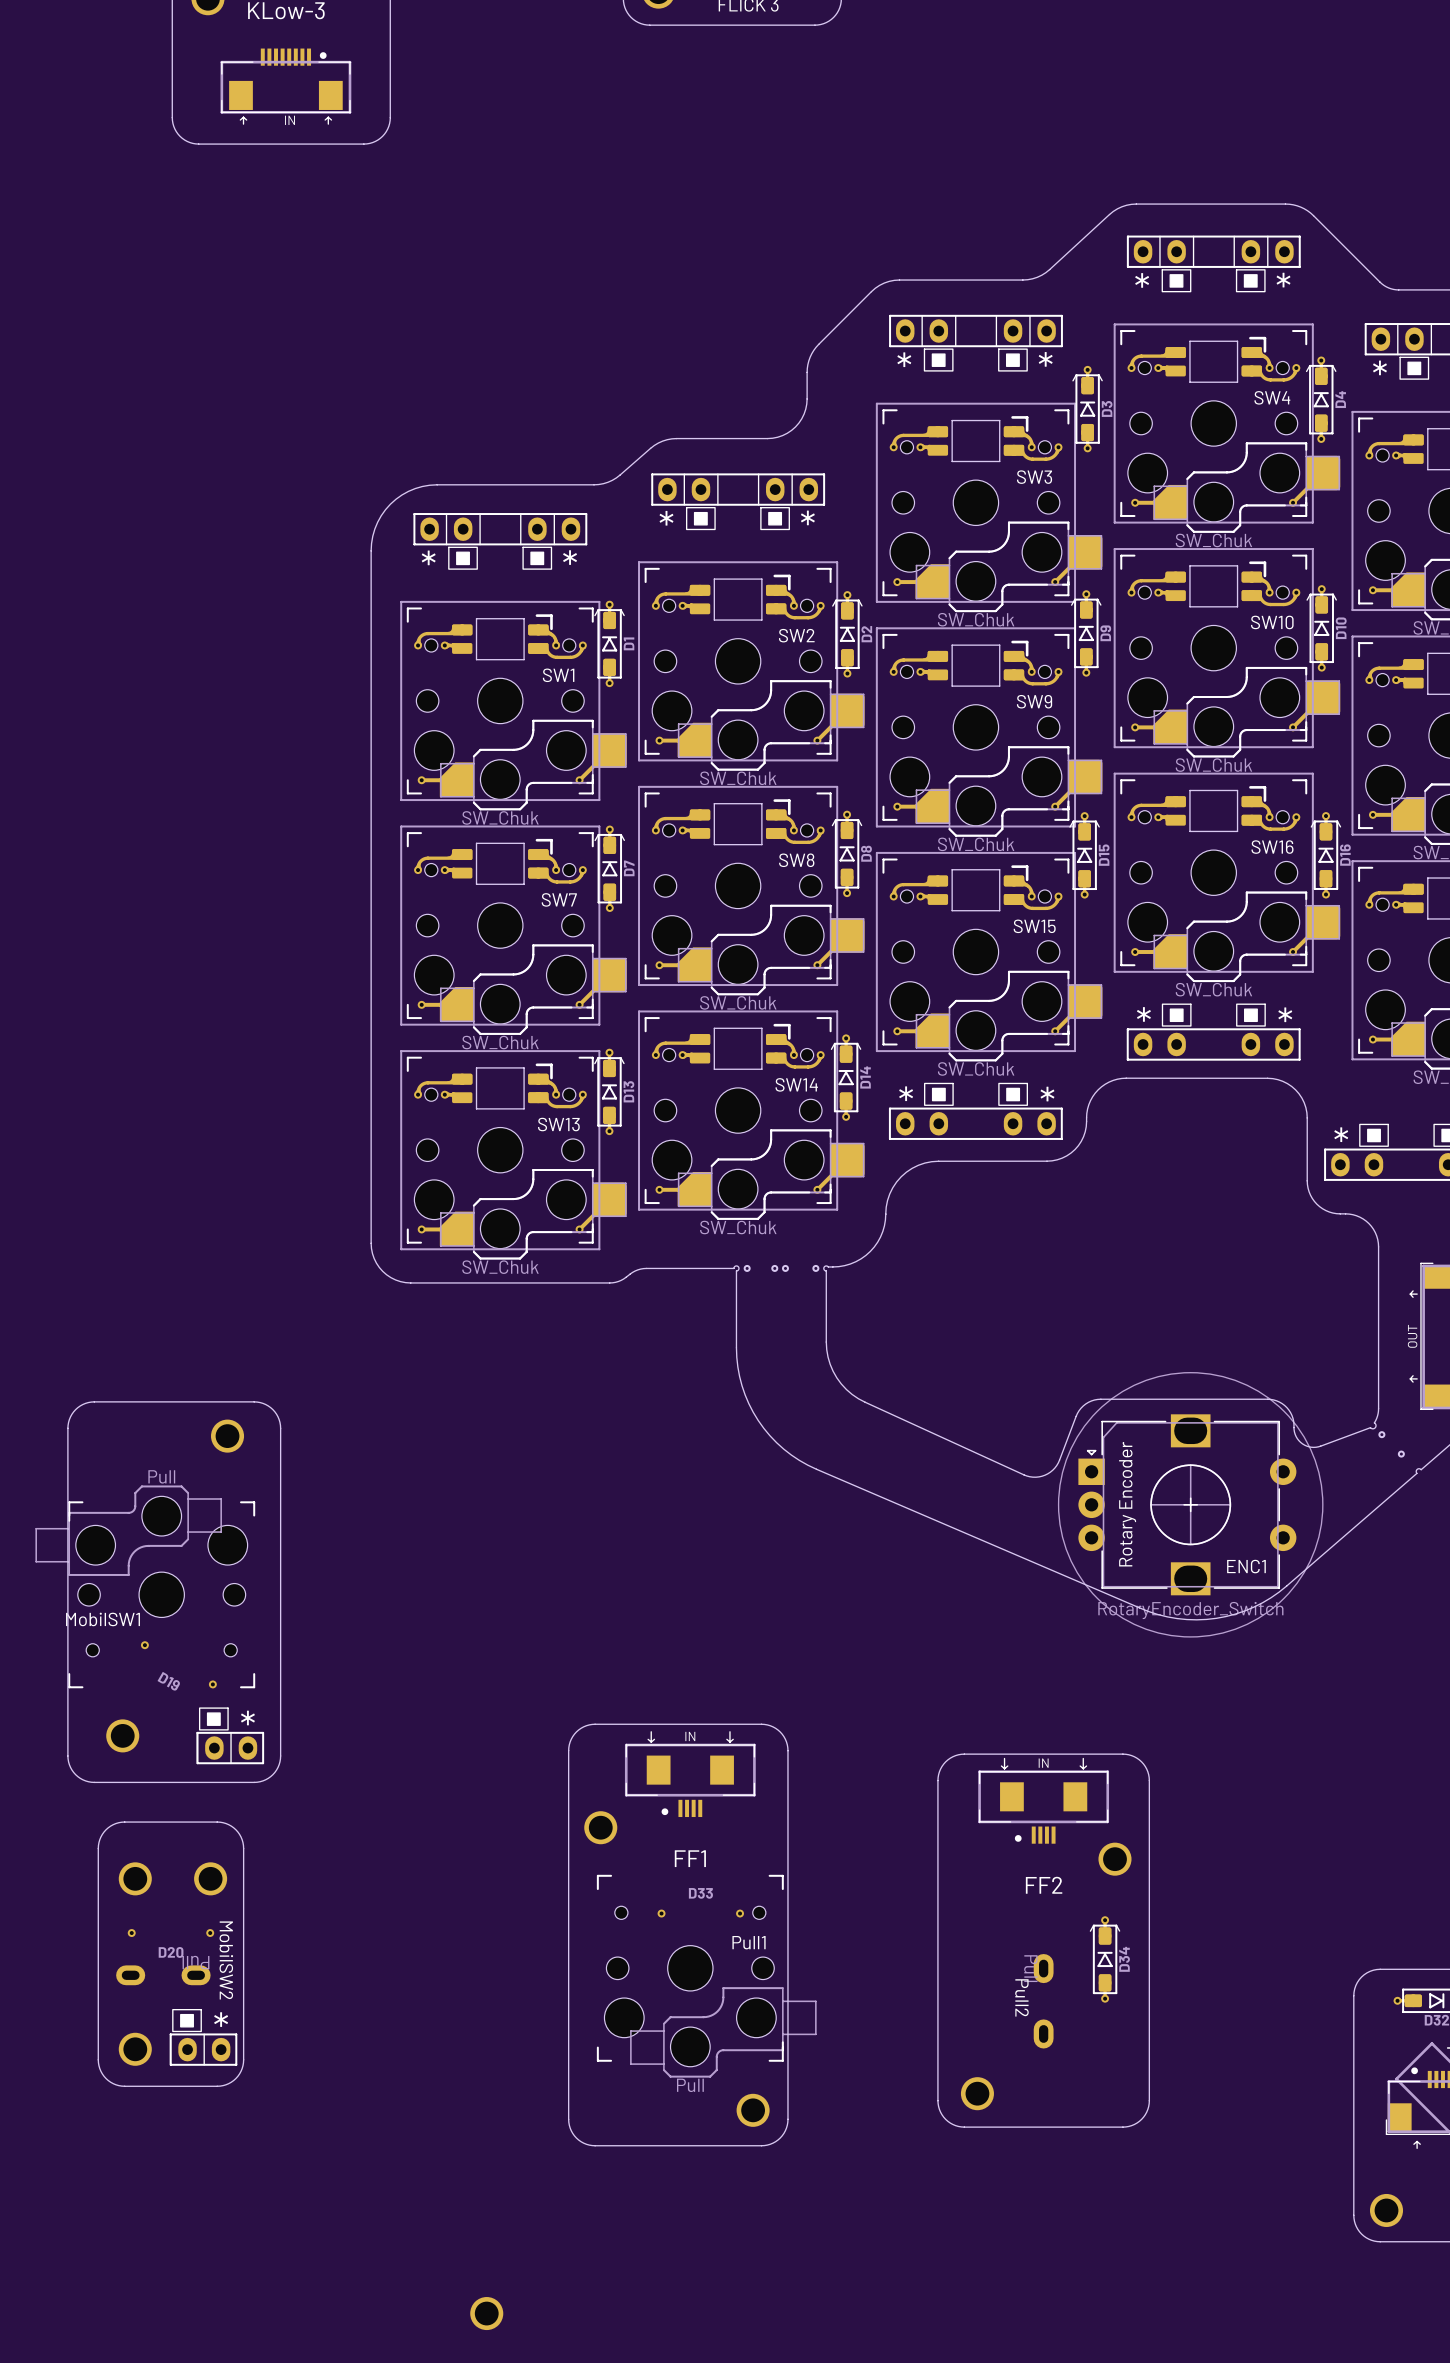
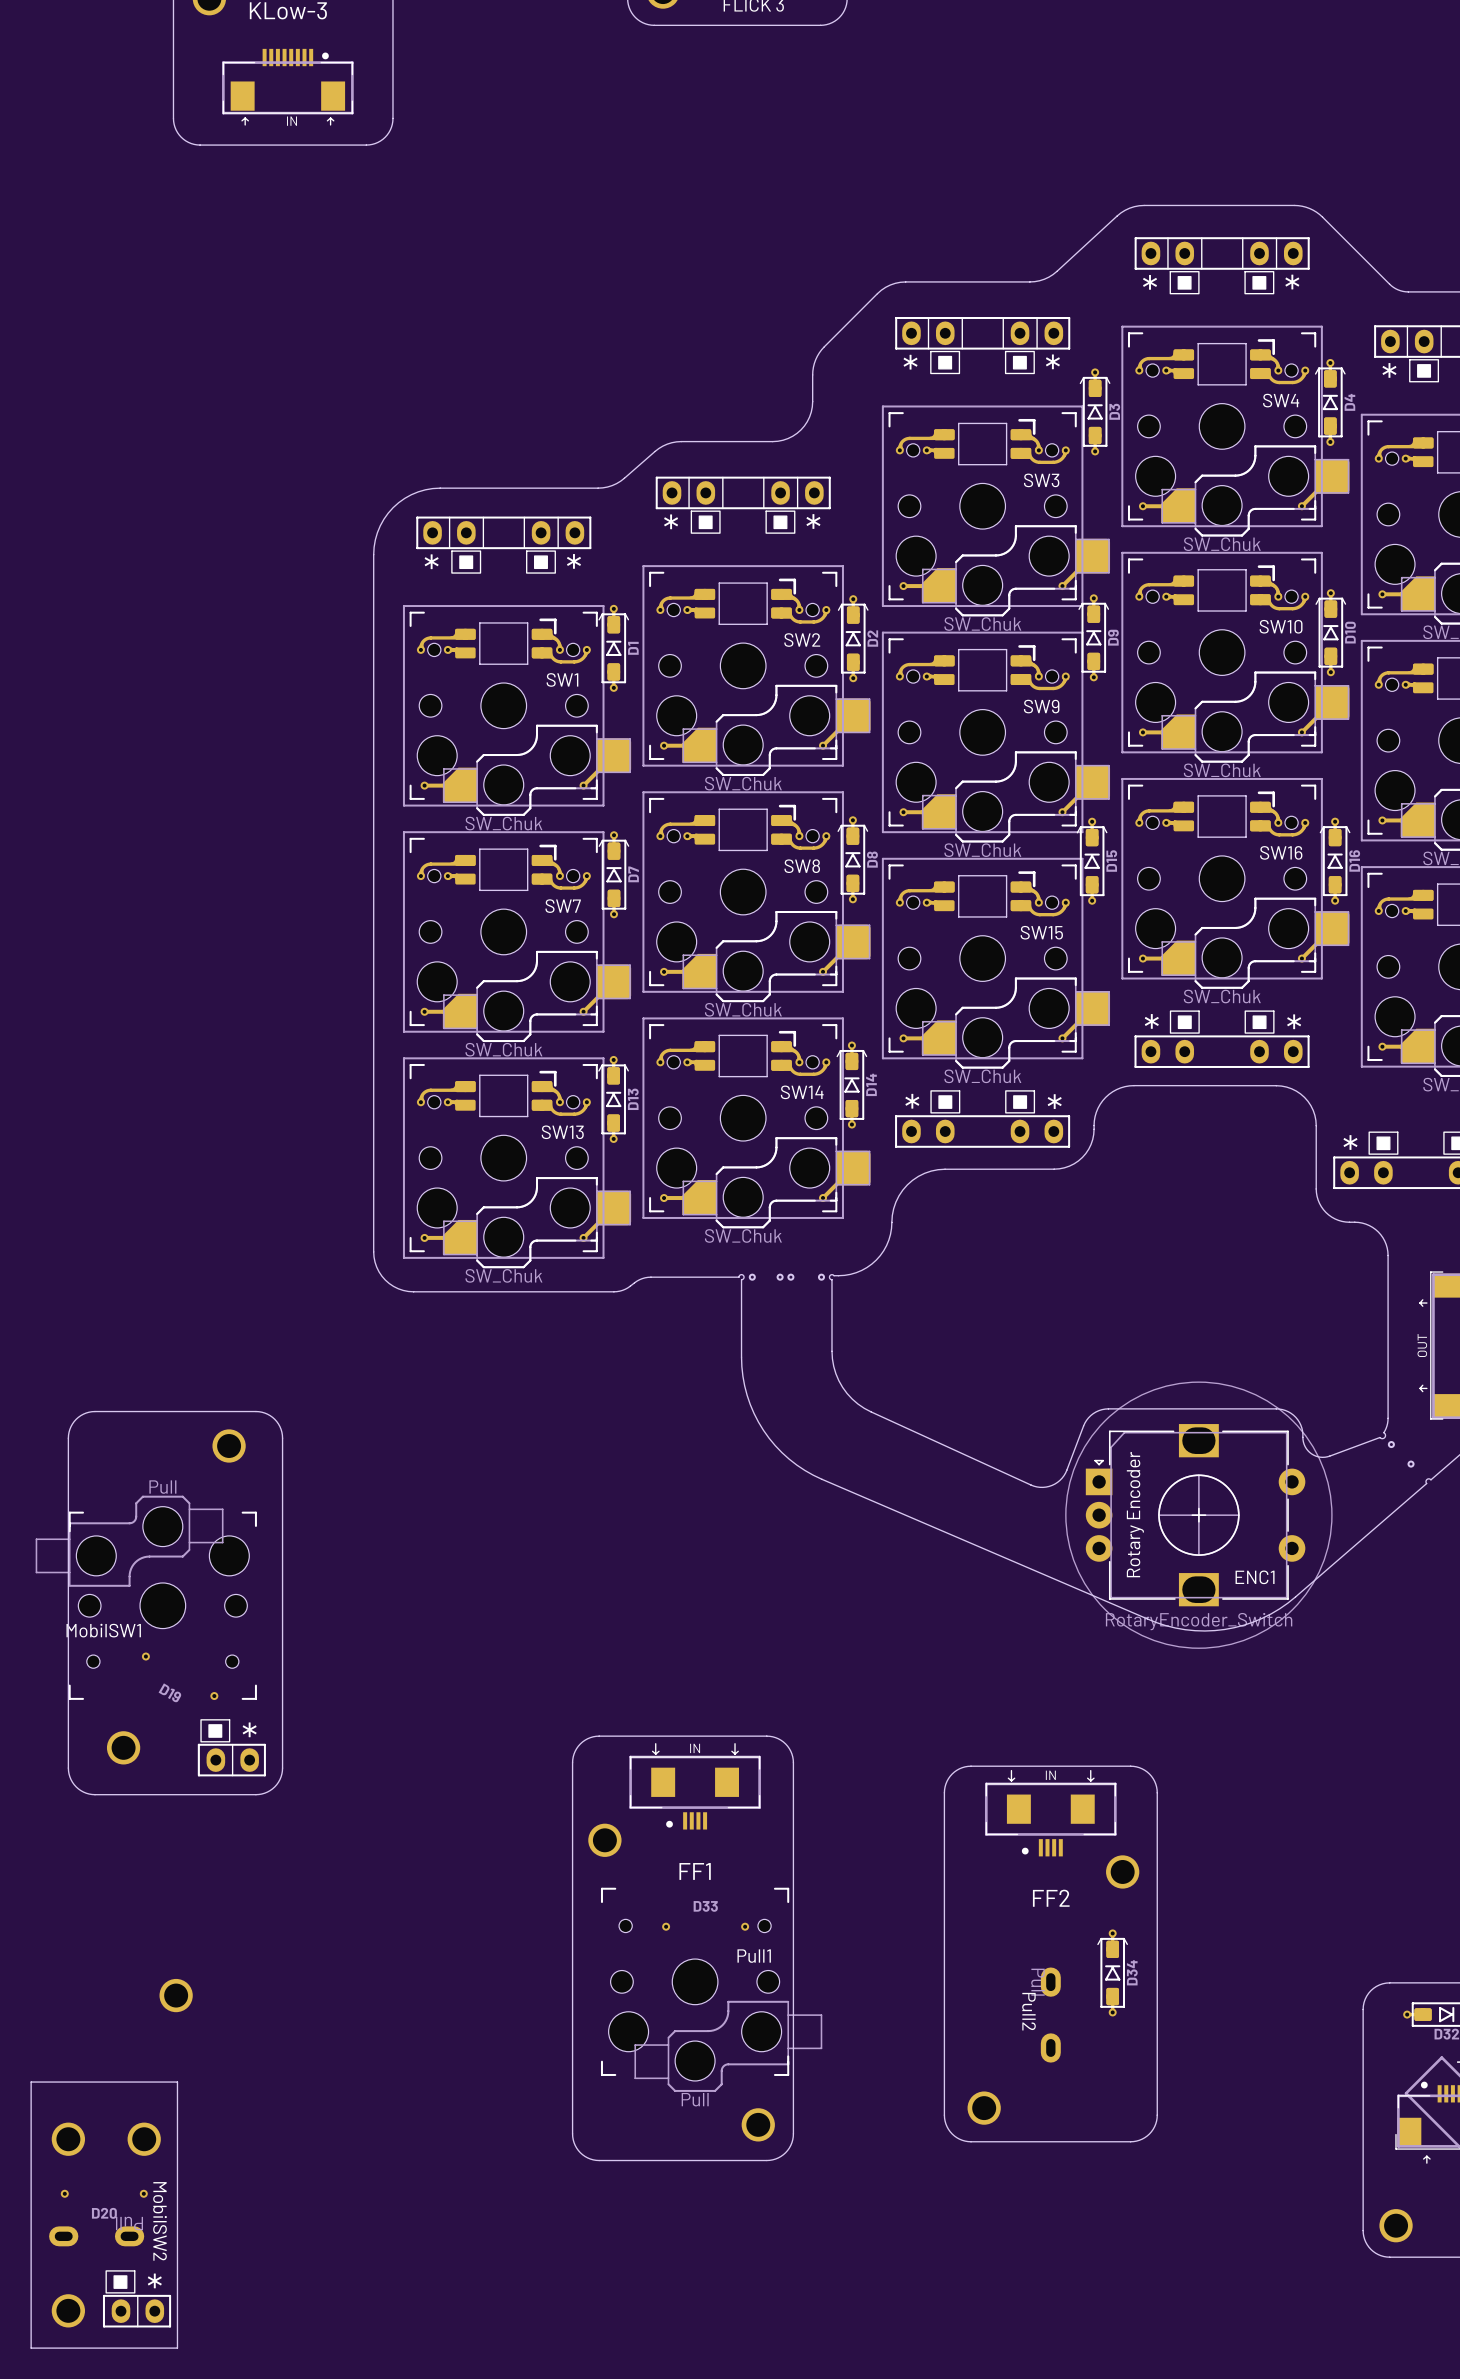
board edge: (124, 1822) (220, 1822) (233, 1827) (242, 1839) (243, 2062) (237, 2076) (225, 2084) (121, 2086) (108, 2080) (99, 2068) (98, 1845) (100, 1837) (108, 1827) (124, 1822) -> none
part: (135, 1878) -> none
part: (210, 1878) -> none
D20 position: (170, 1933) -> (104, 2193)
MobilSW2 position: (163, 1975) -> (96, 2236)
part: none -> (176, 1995)
part position: (203, 2037) -> (137, 2298)
part: (135, 2049) -> none
board edge: none -> (31, 2082) (177, 2082) (177, 2348) (31, 2348) (31, 2082)
part: none -> (68, 2139)
part: none -> (144, 2139)
part: none -> (68, 2310)
part: (486, 2313) -> none

